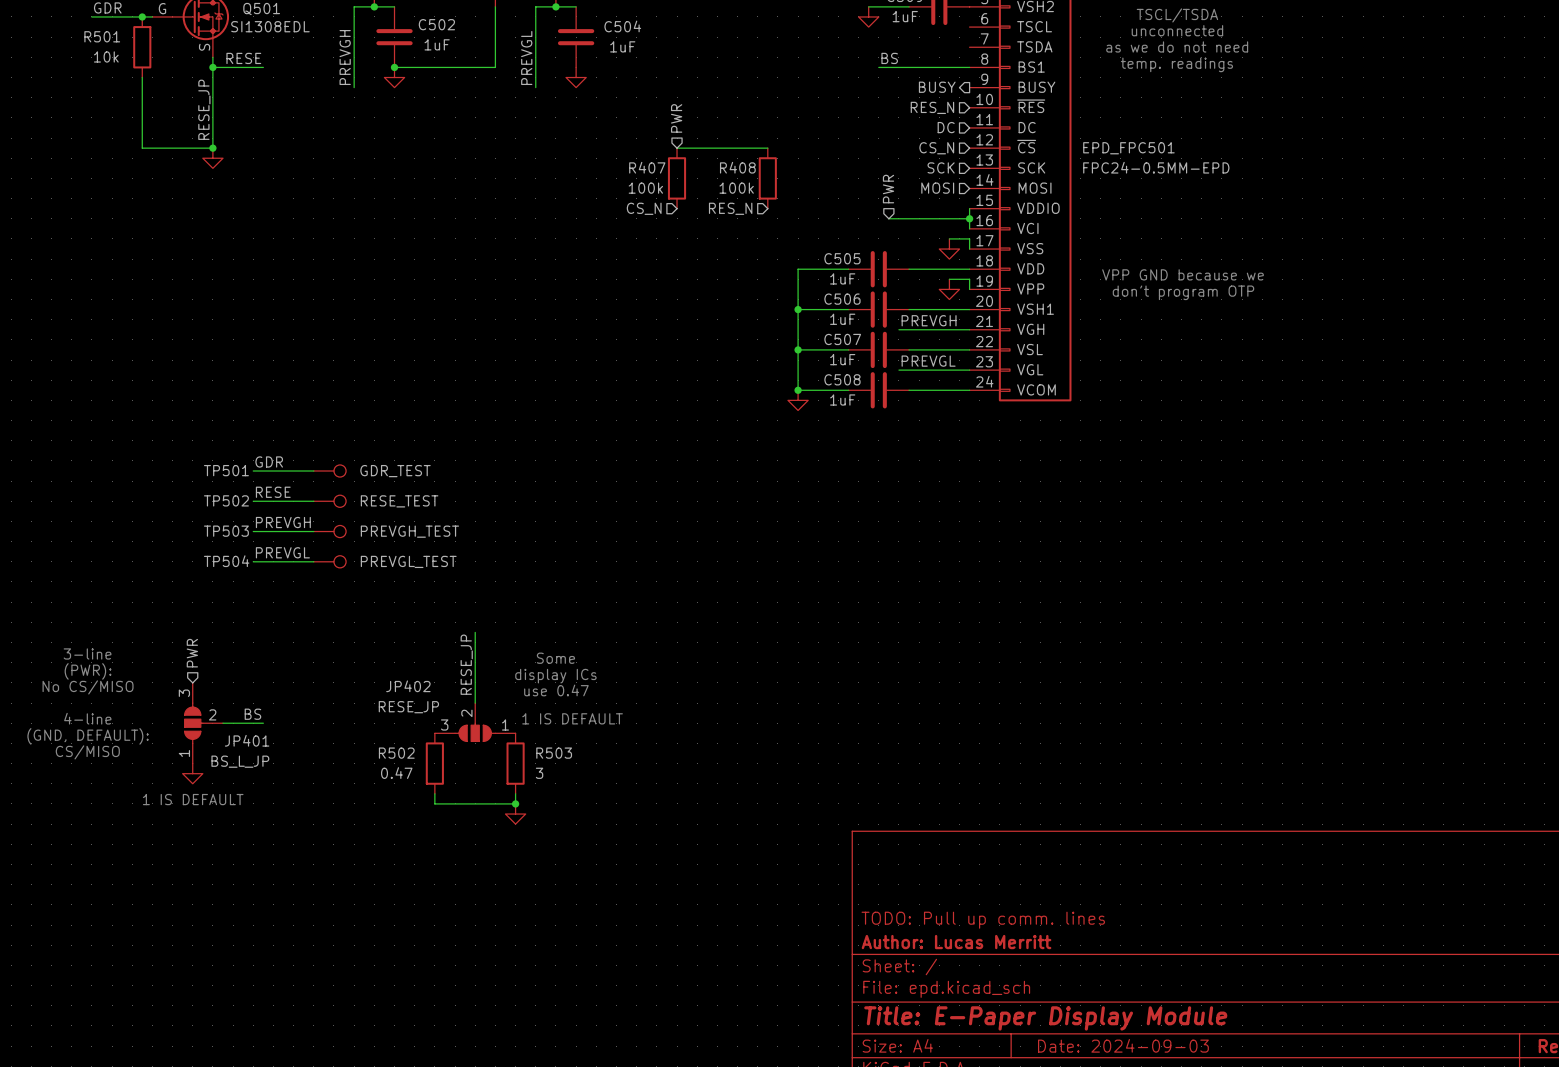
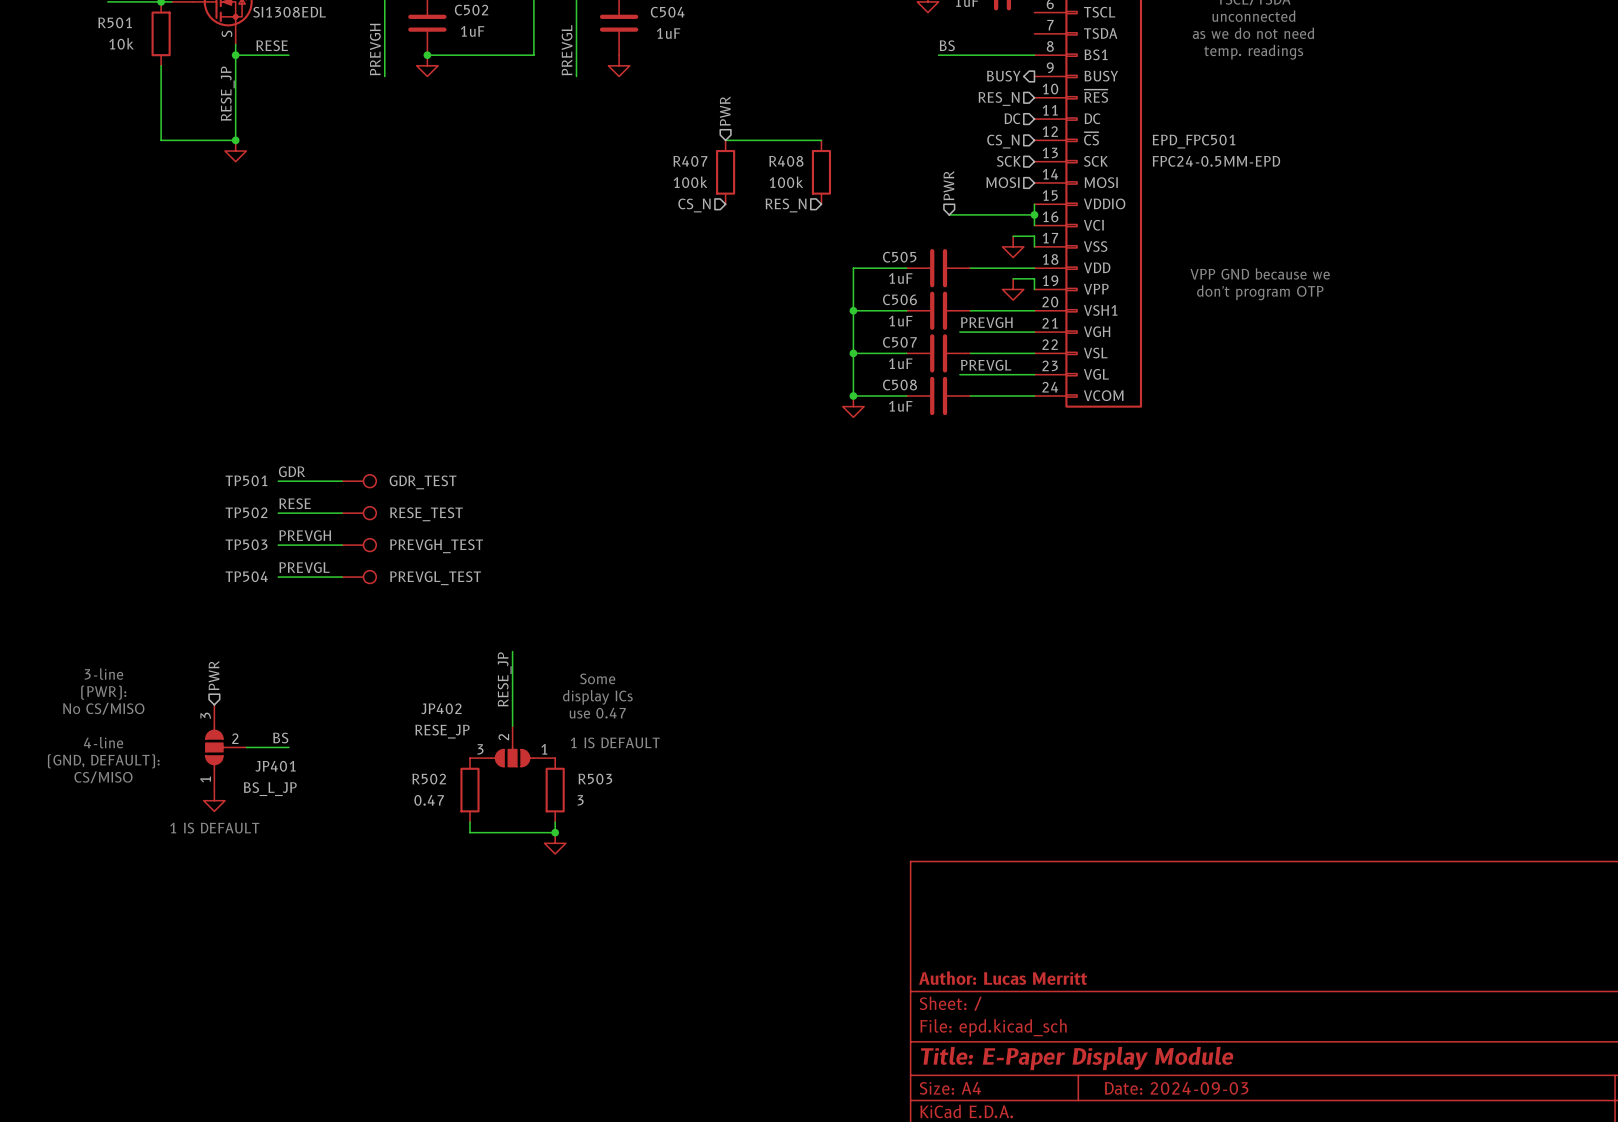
title block: TODO: Pull up comm. lines (983, 920) -> none

